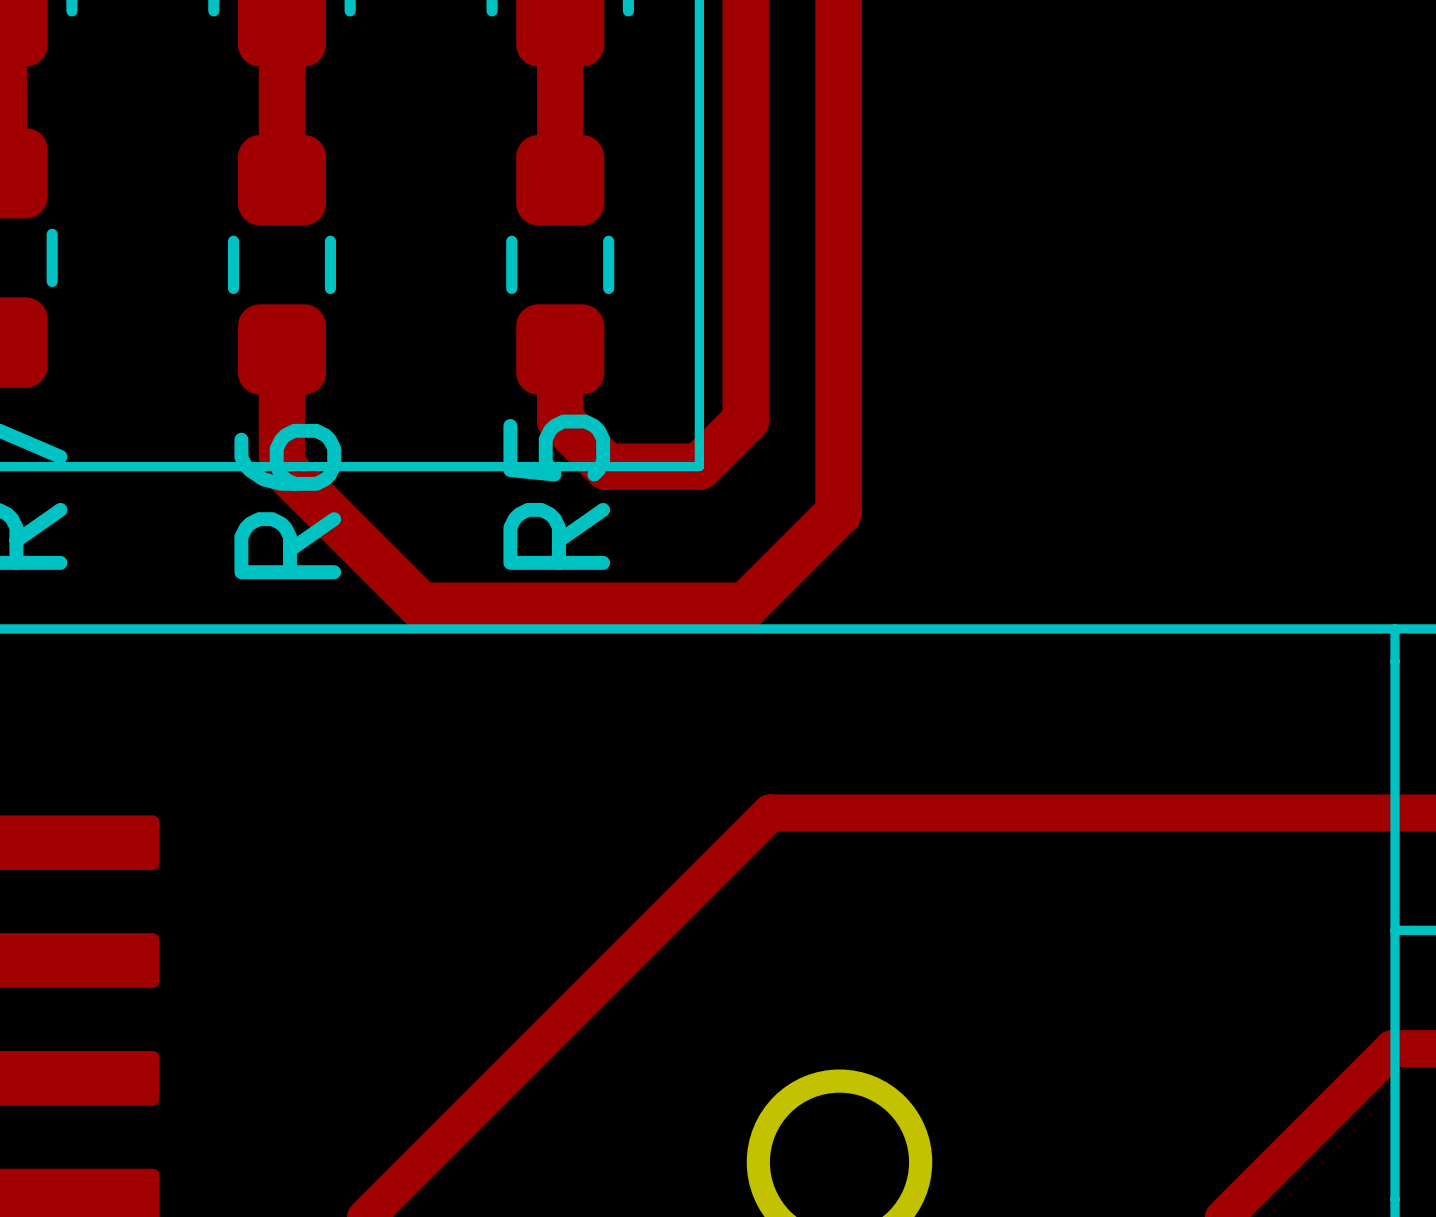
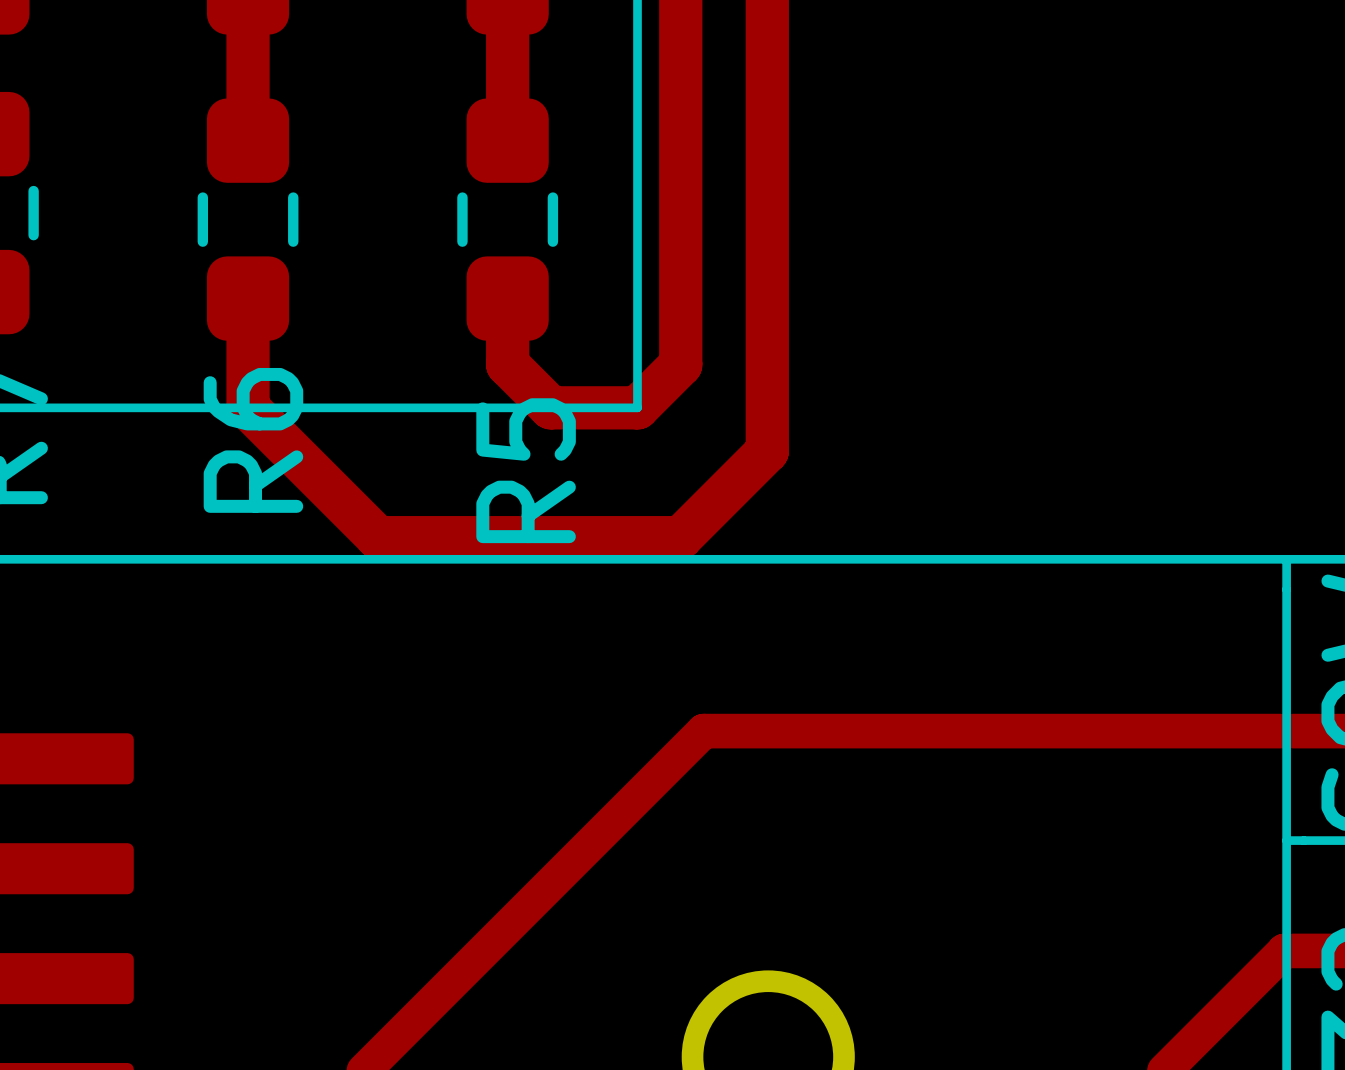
R5 name position: R5 (556, 492) -> R5 (526, 470)

